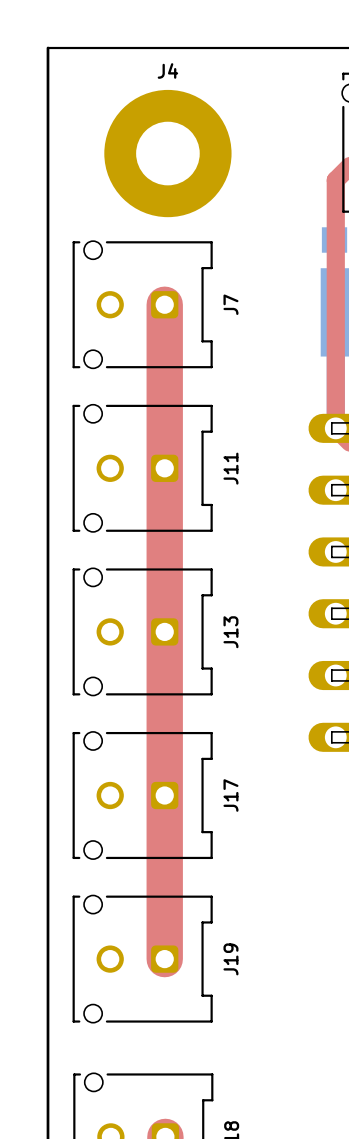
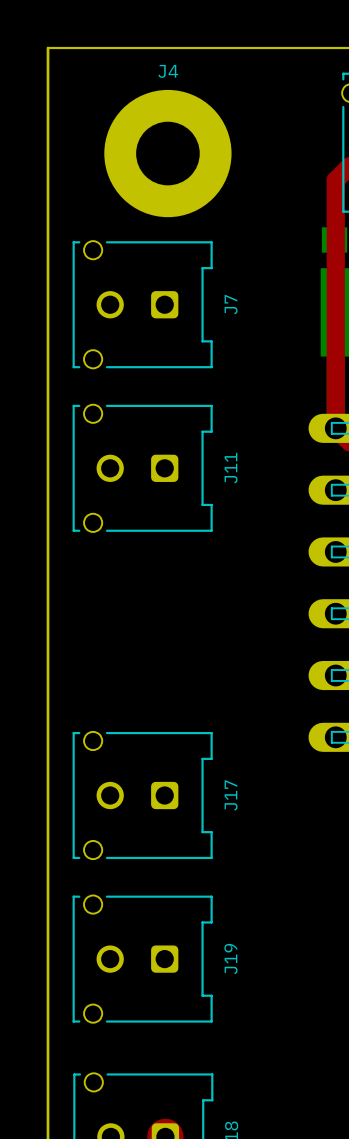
top track: (164, 304) (164, 959) -> none
J13: (142, 631) -> none

